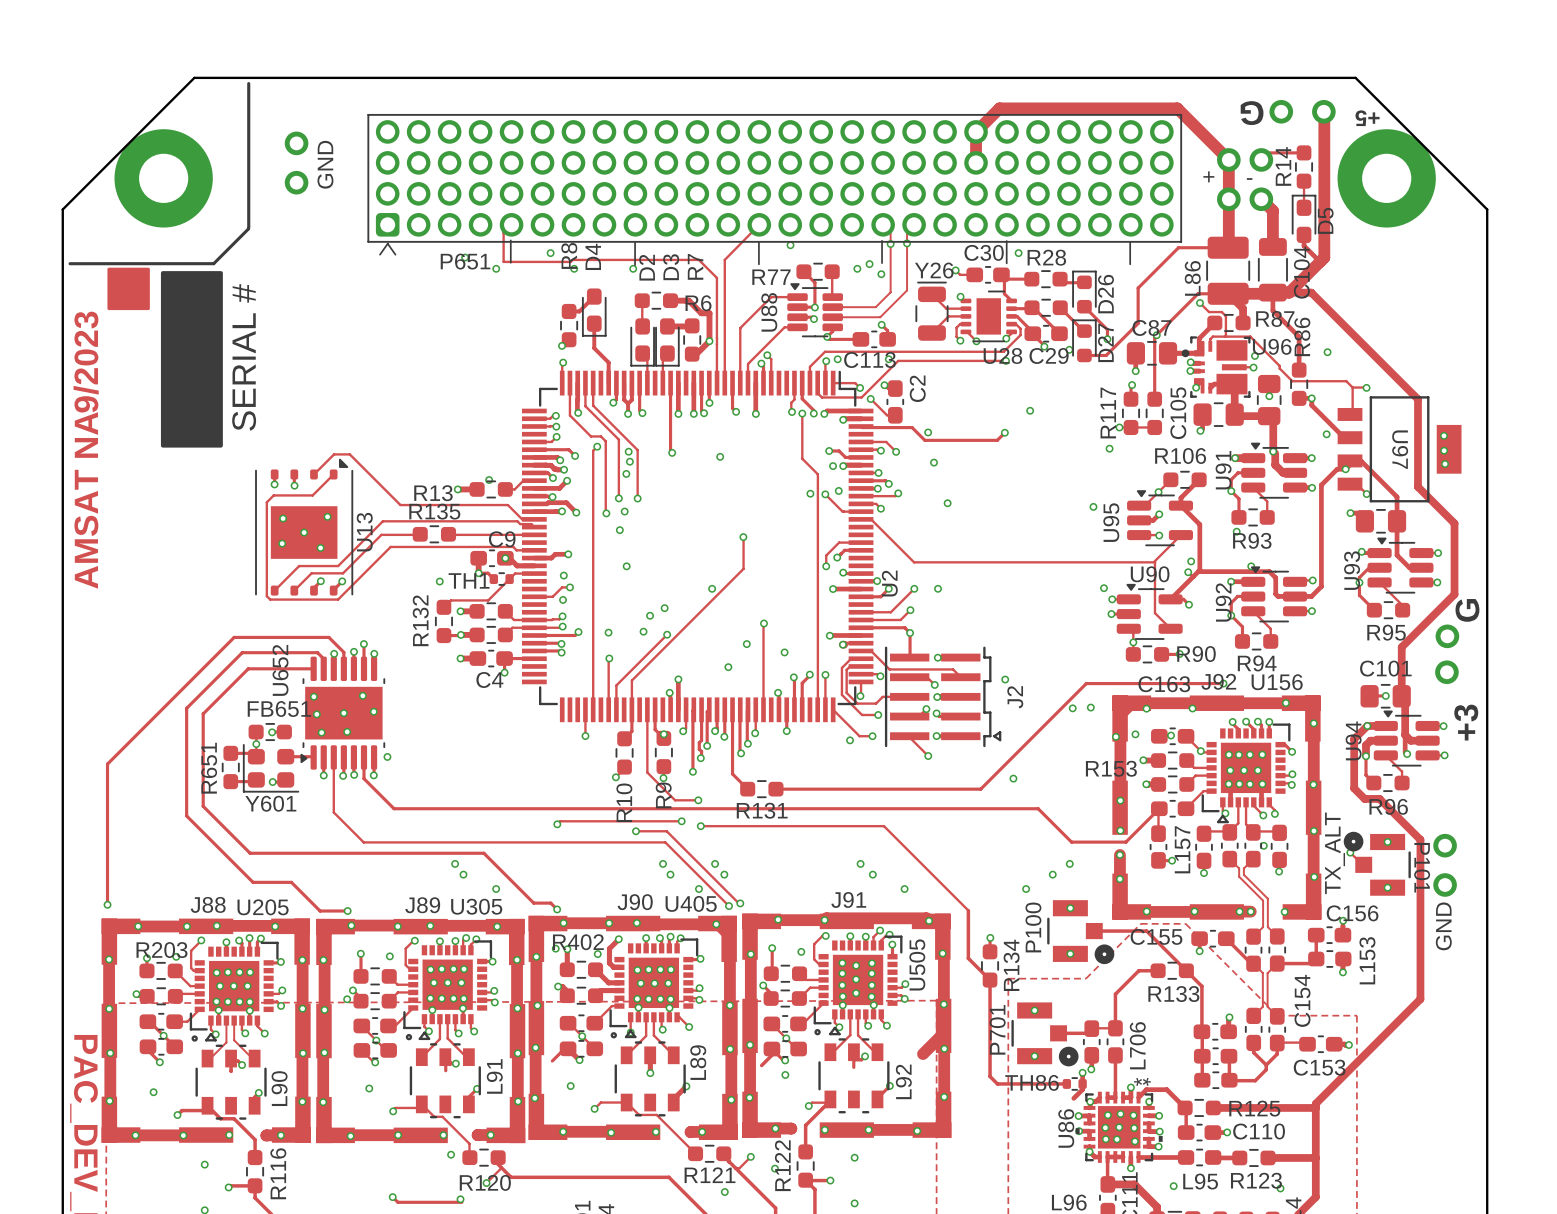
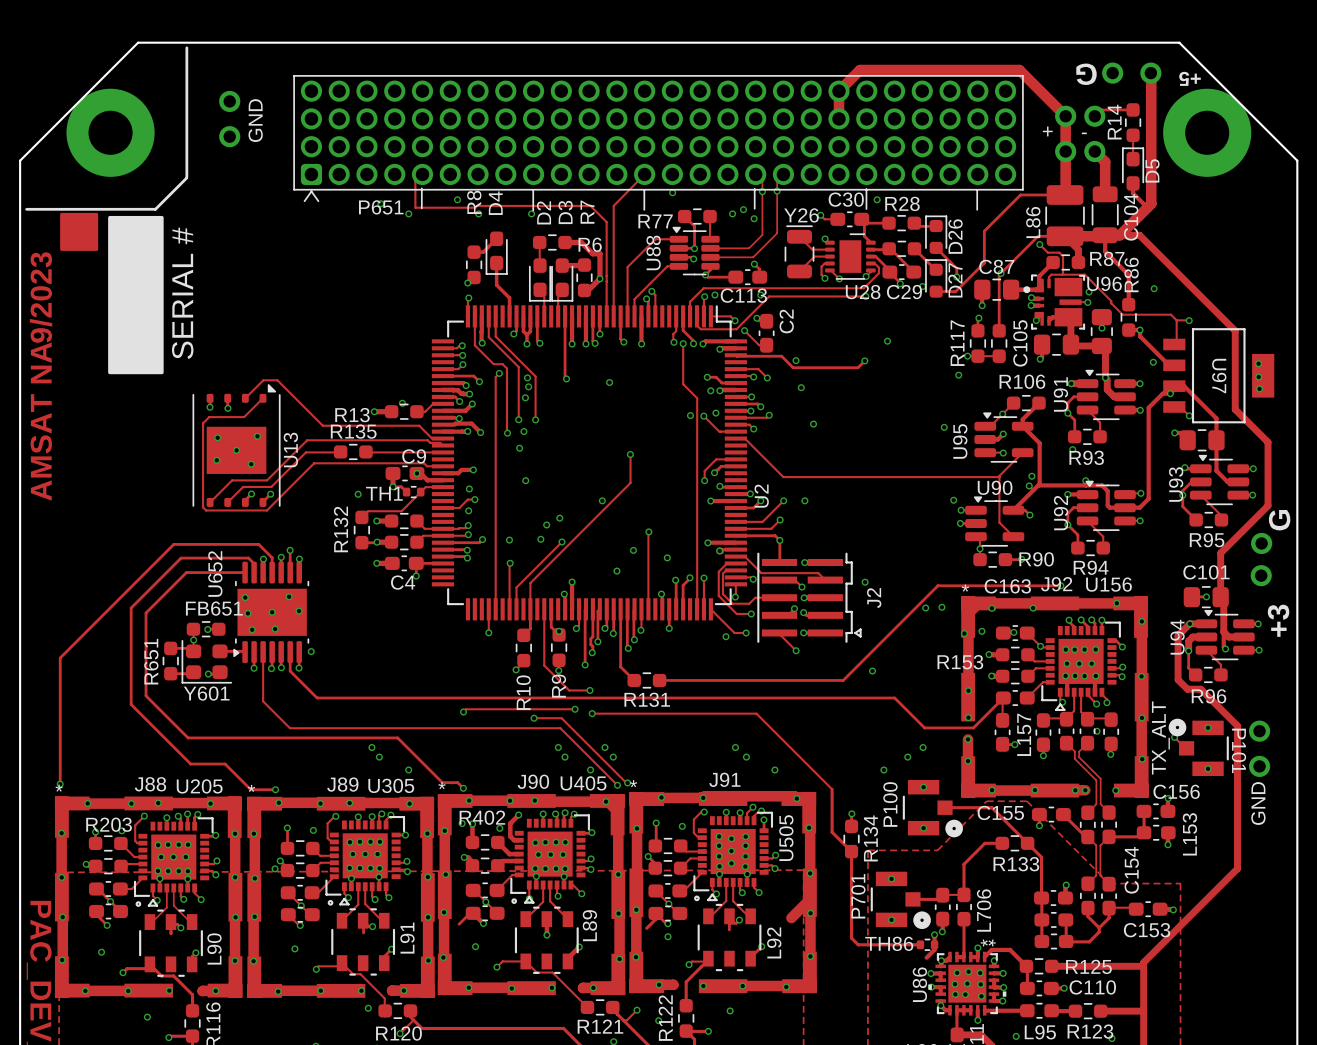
J92 text: none -> * (965, 588)
J91 text: none -> * (633, 783)
J90 text: none -> * (442, 785)
J88 text: none -> * (59, 788)
J89 text: none -> * (251, 788)

